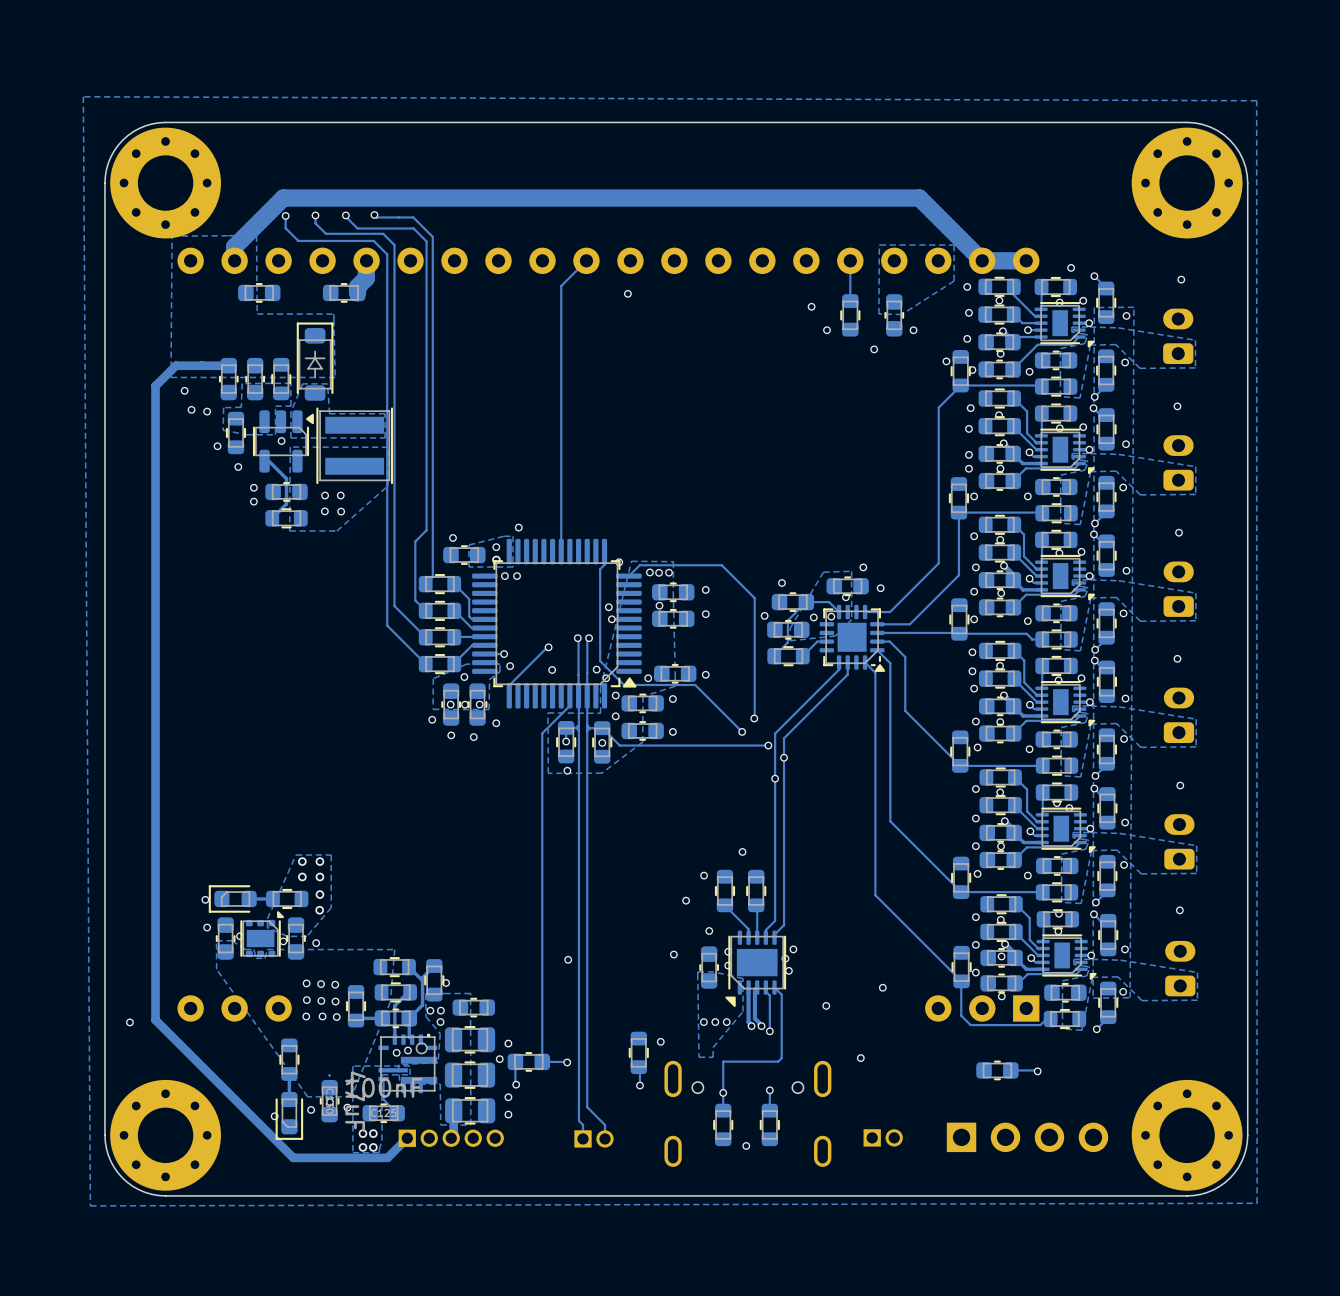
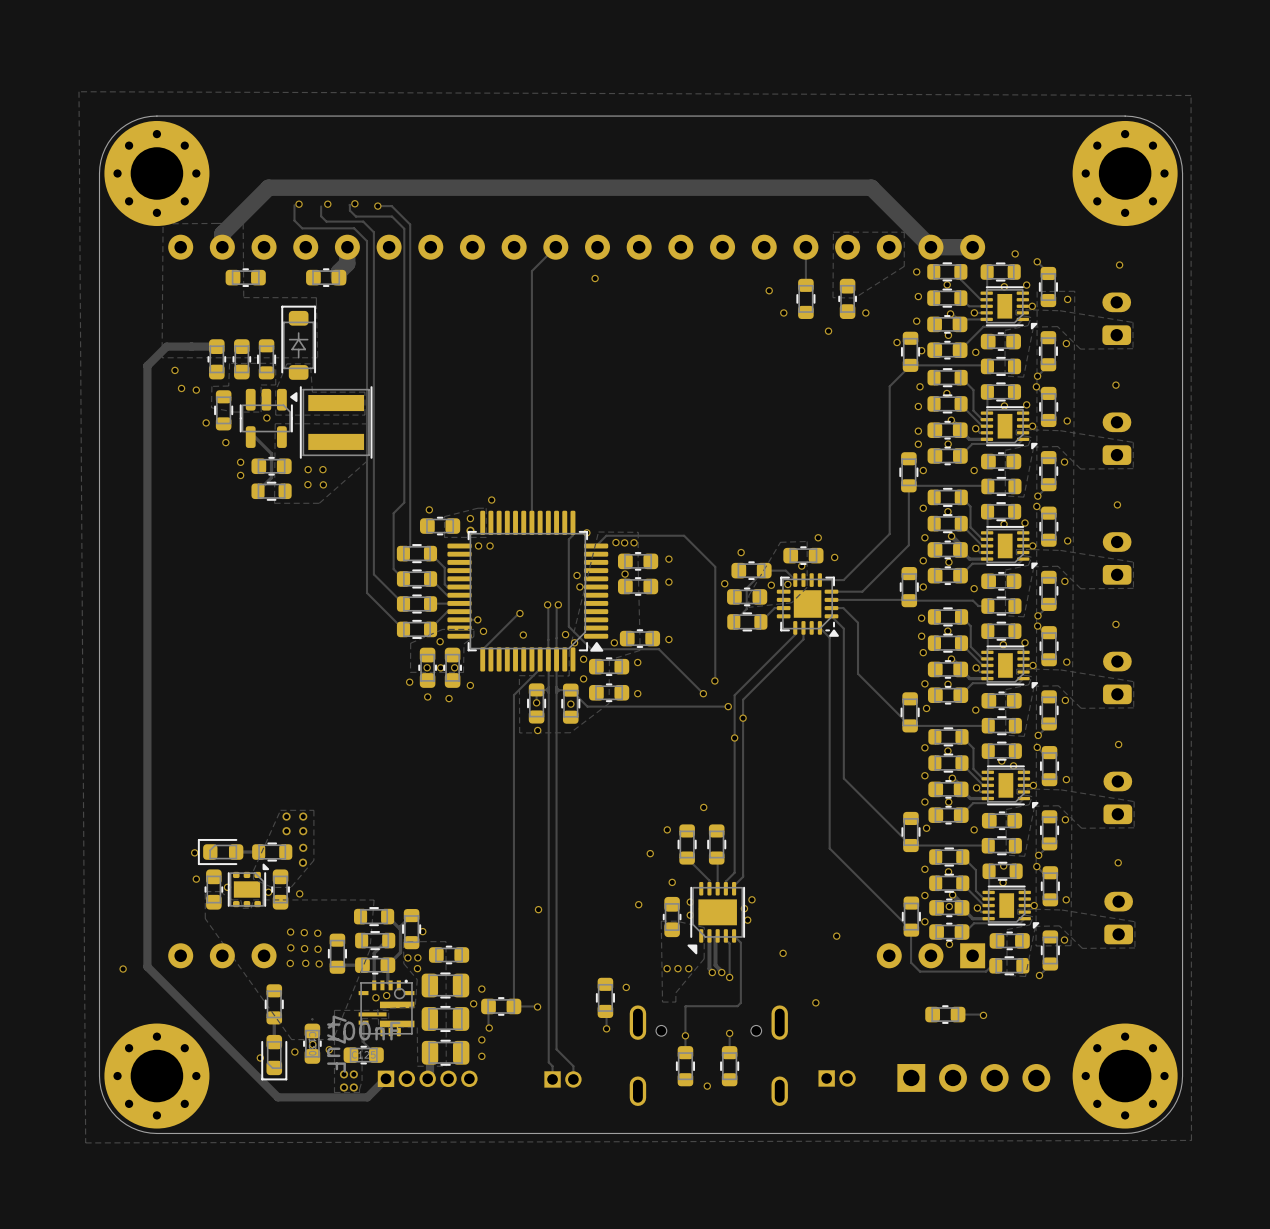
track: (285, 215) (285, 228) (298, 240) (318, 240) -> (294, 205) (294, 220) (302, 228)
via: (285, 215) -> none
track: (315, 215) (315, 223) (325, 233) (344, 233) -> (321, 206) (321, 216) (326, 221)
track: (345, 215) (357, 228) (375, 228) -> (349, 204) (349, 210) (355, 216)
track: (374, 215) (376, 217) (398, 217) -> none
via: none -> (377, 206)

